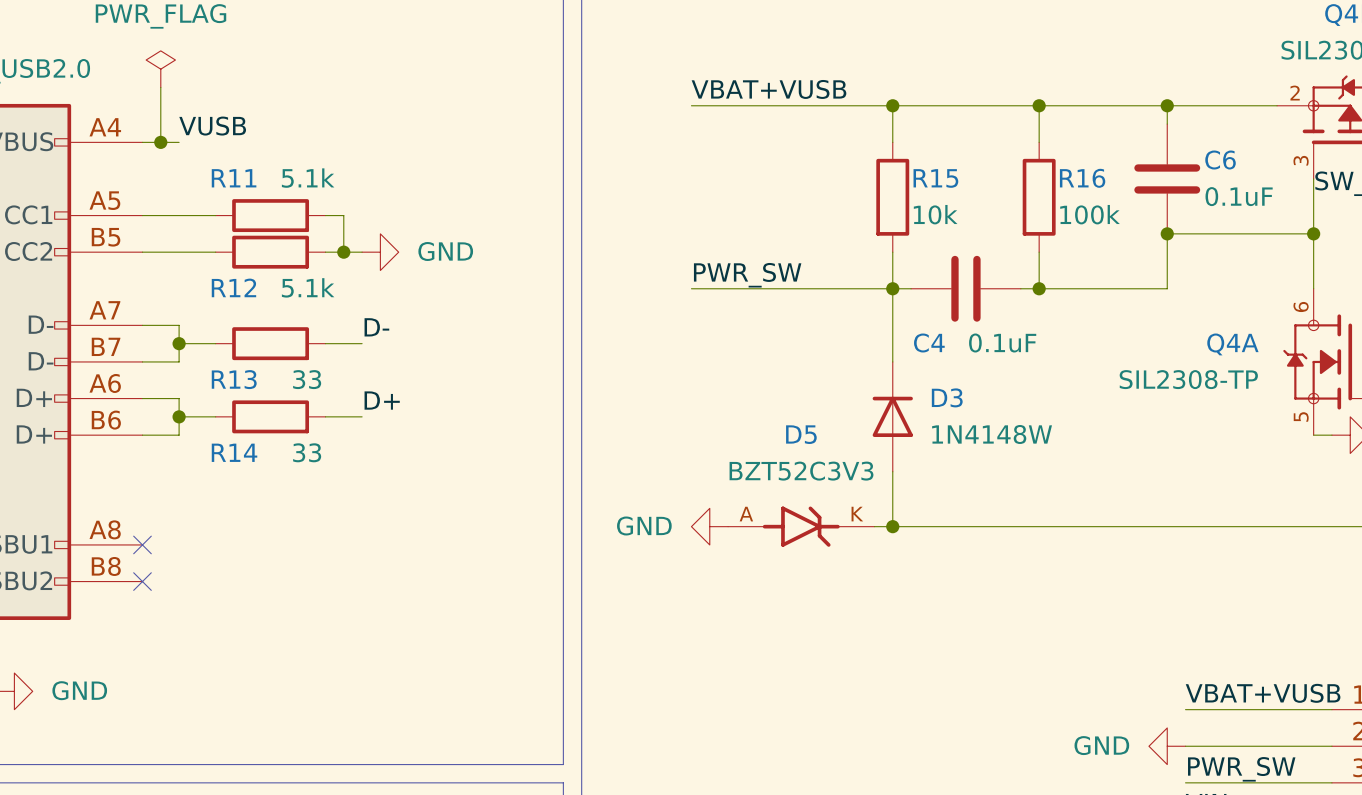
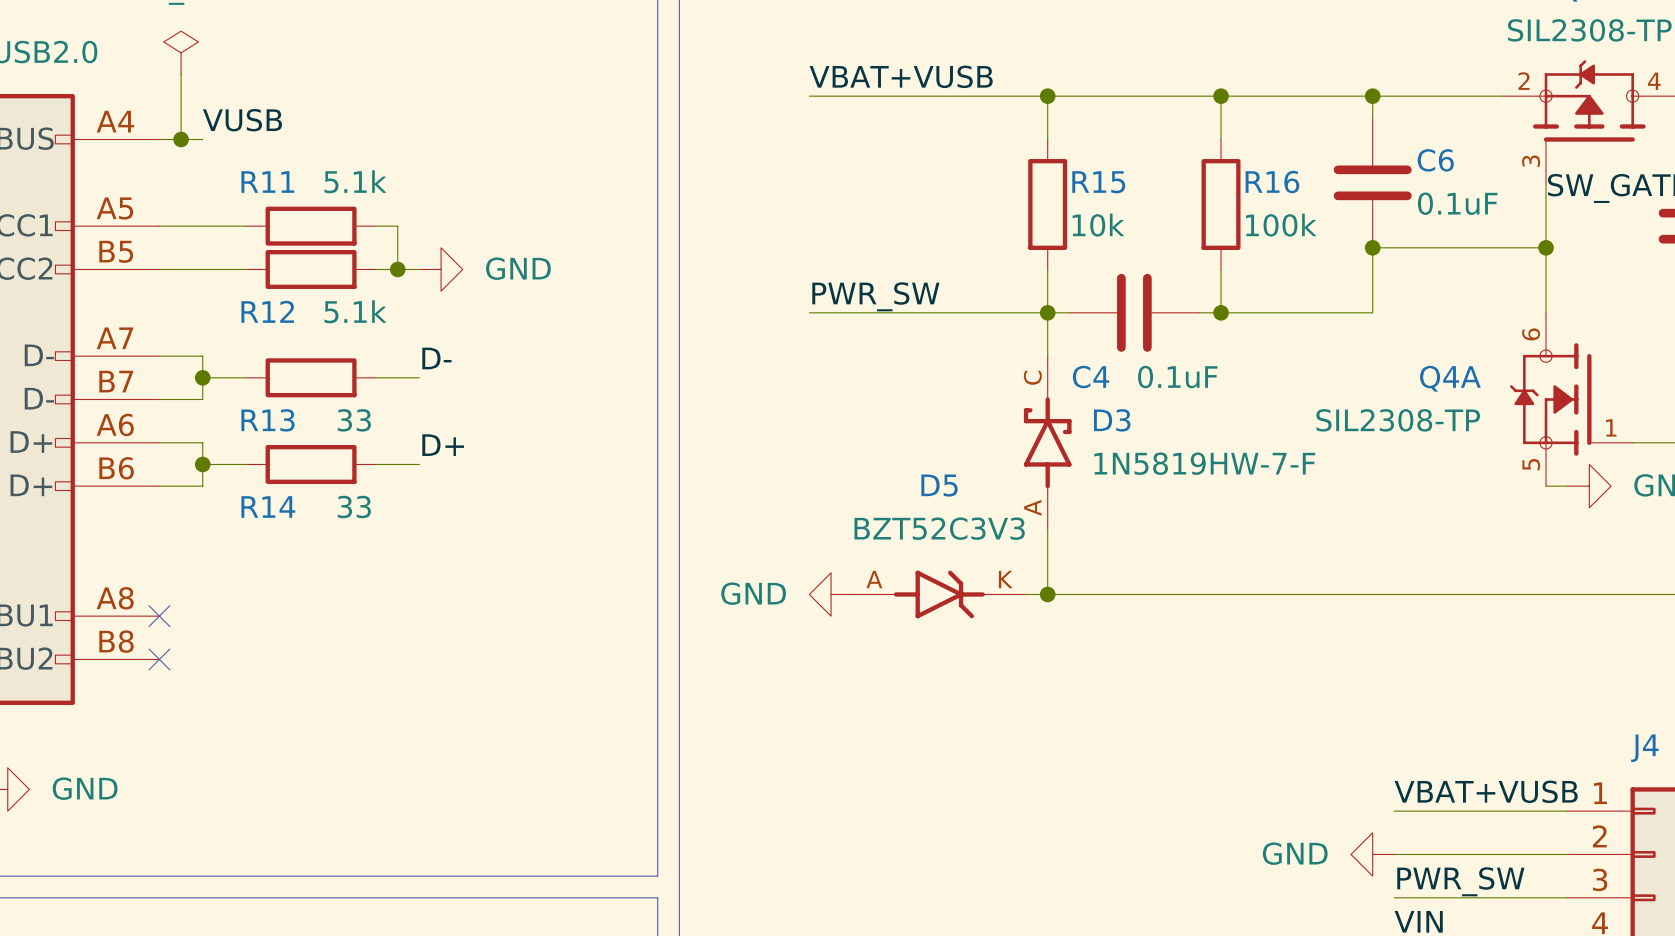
D3 symbol: [872, 361, 913, 472] -> [1023, 356, 1072, 530]
D3 value: 1N4148W (992, 434) -> 1N5819HW-7-F (1204, 463)

